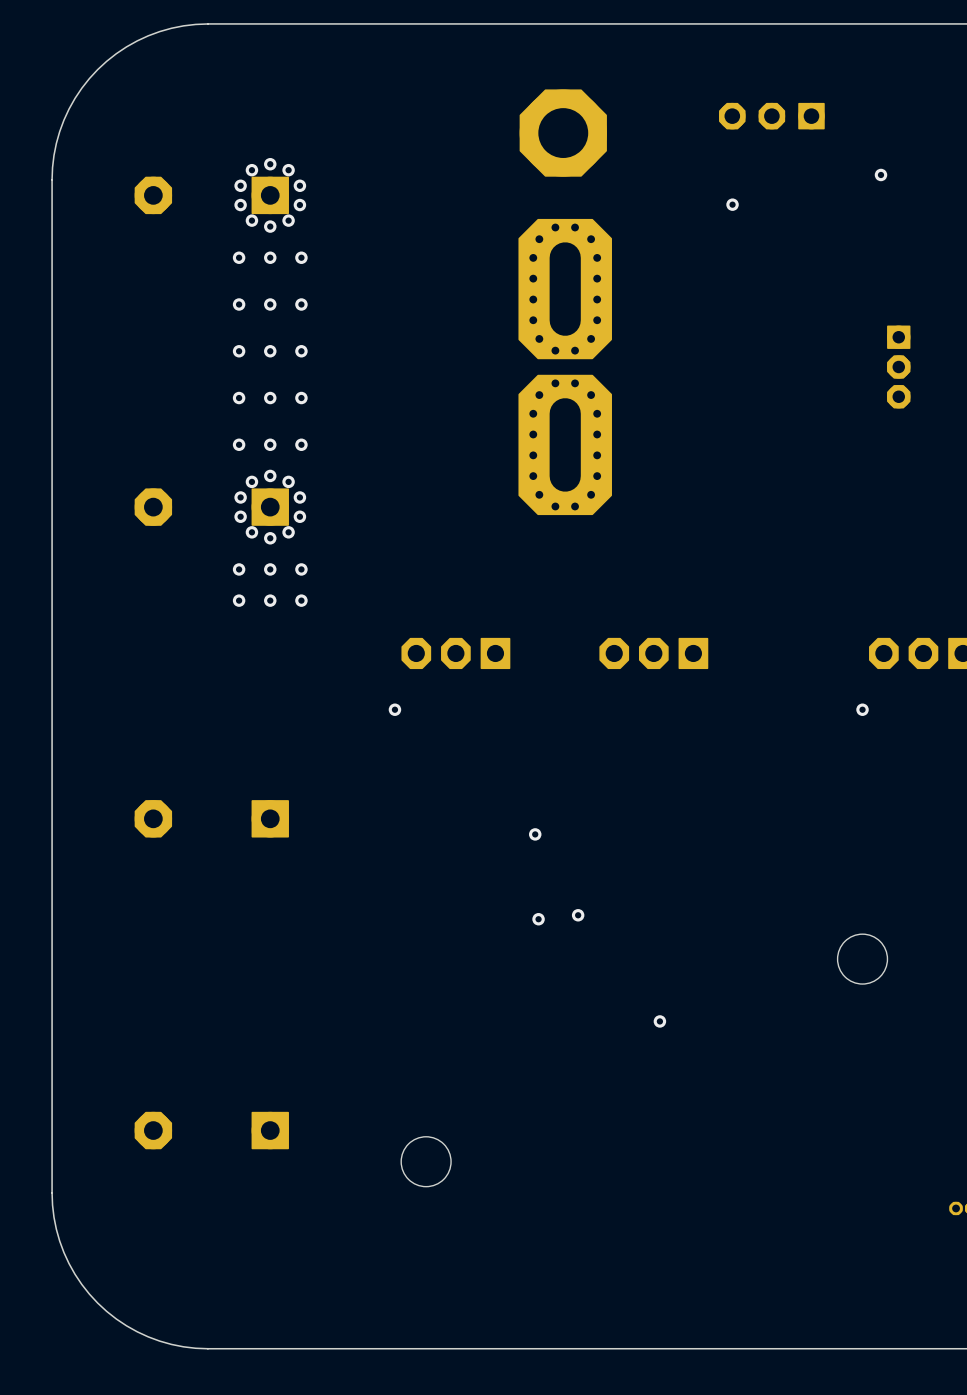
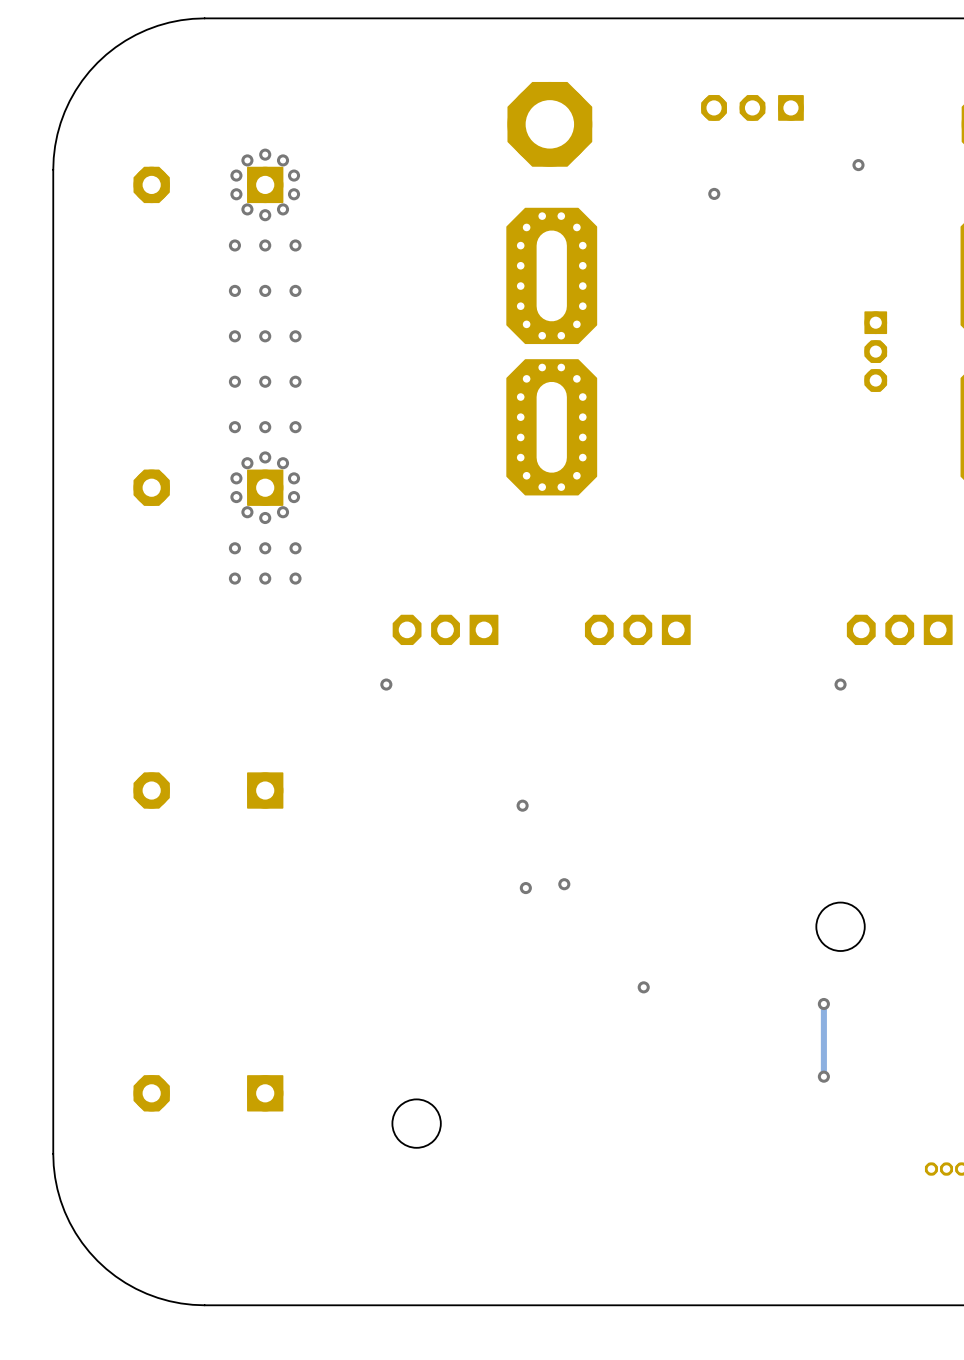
track: none -> (823, 1004) (823, 1076)
via: none -> (823, 1004)
via: none -> (823, 1076)

